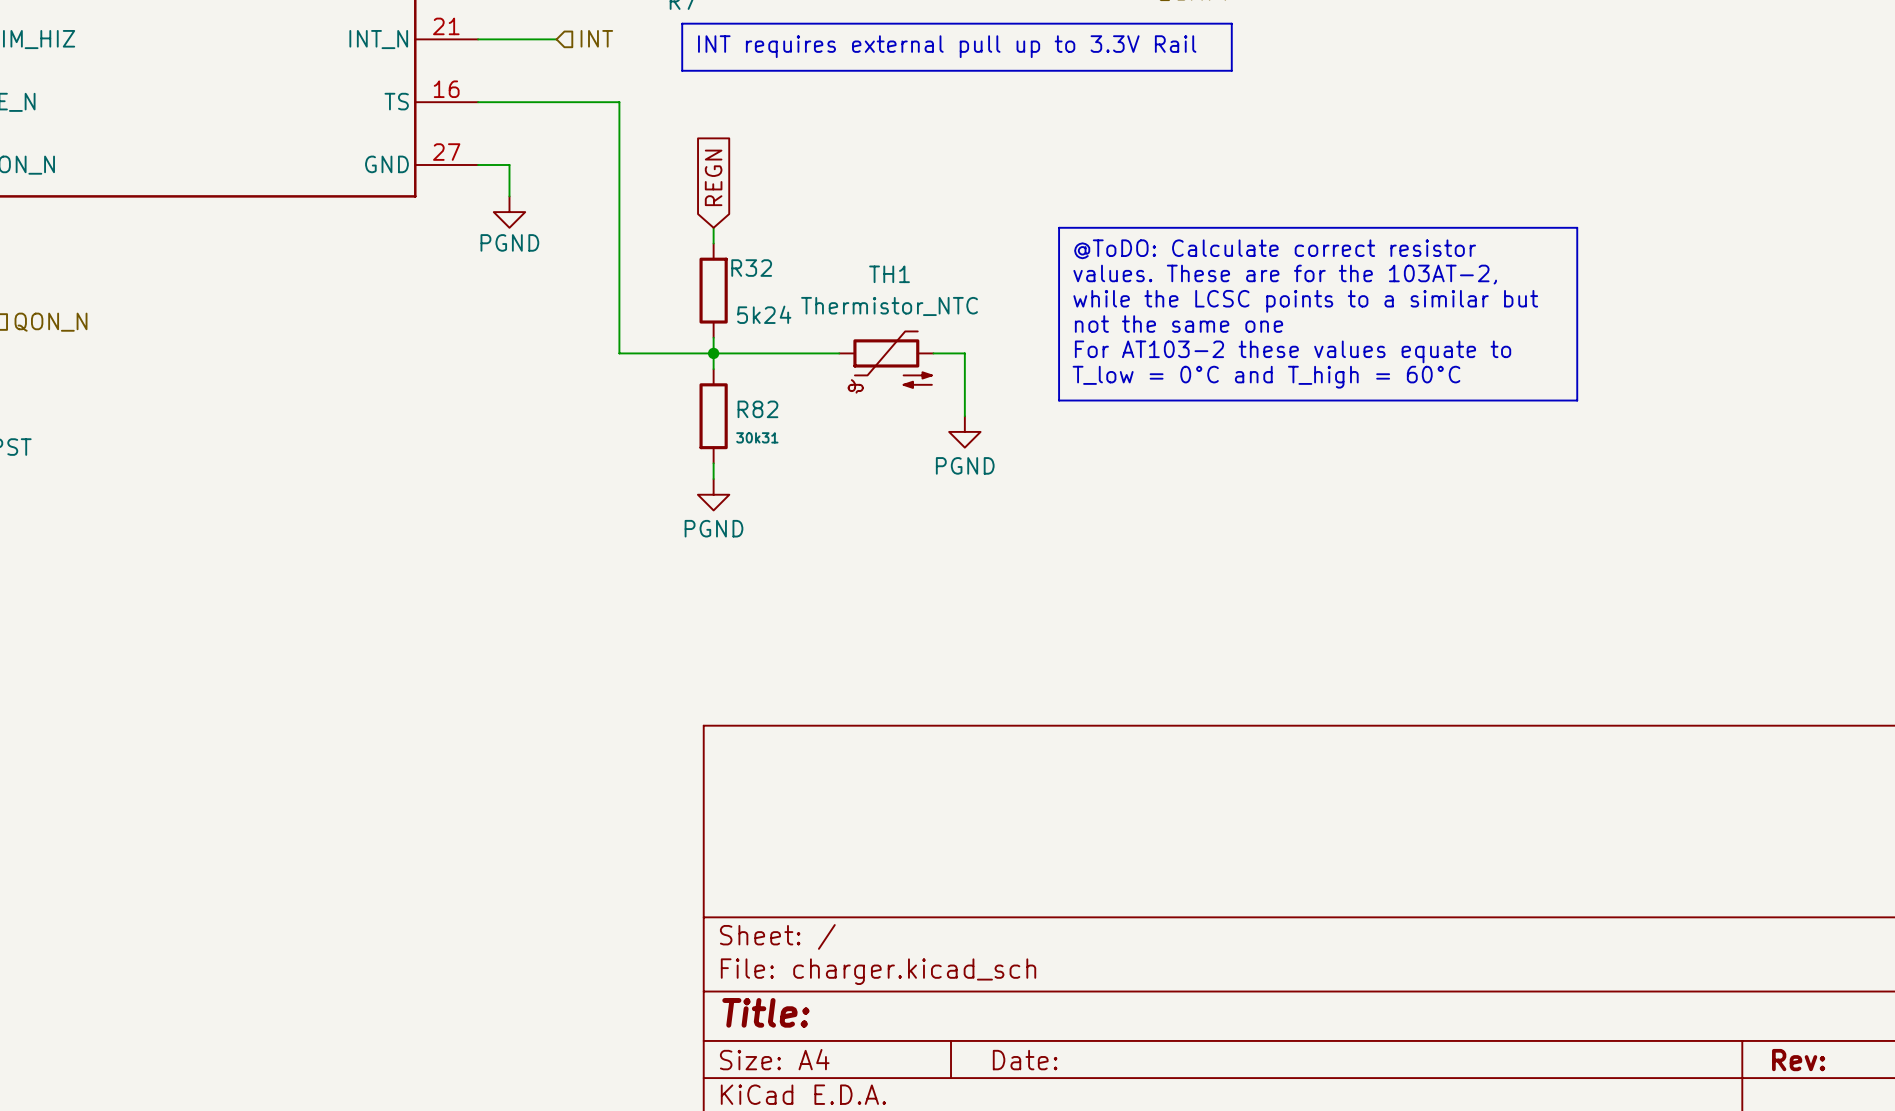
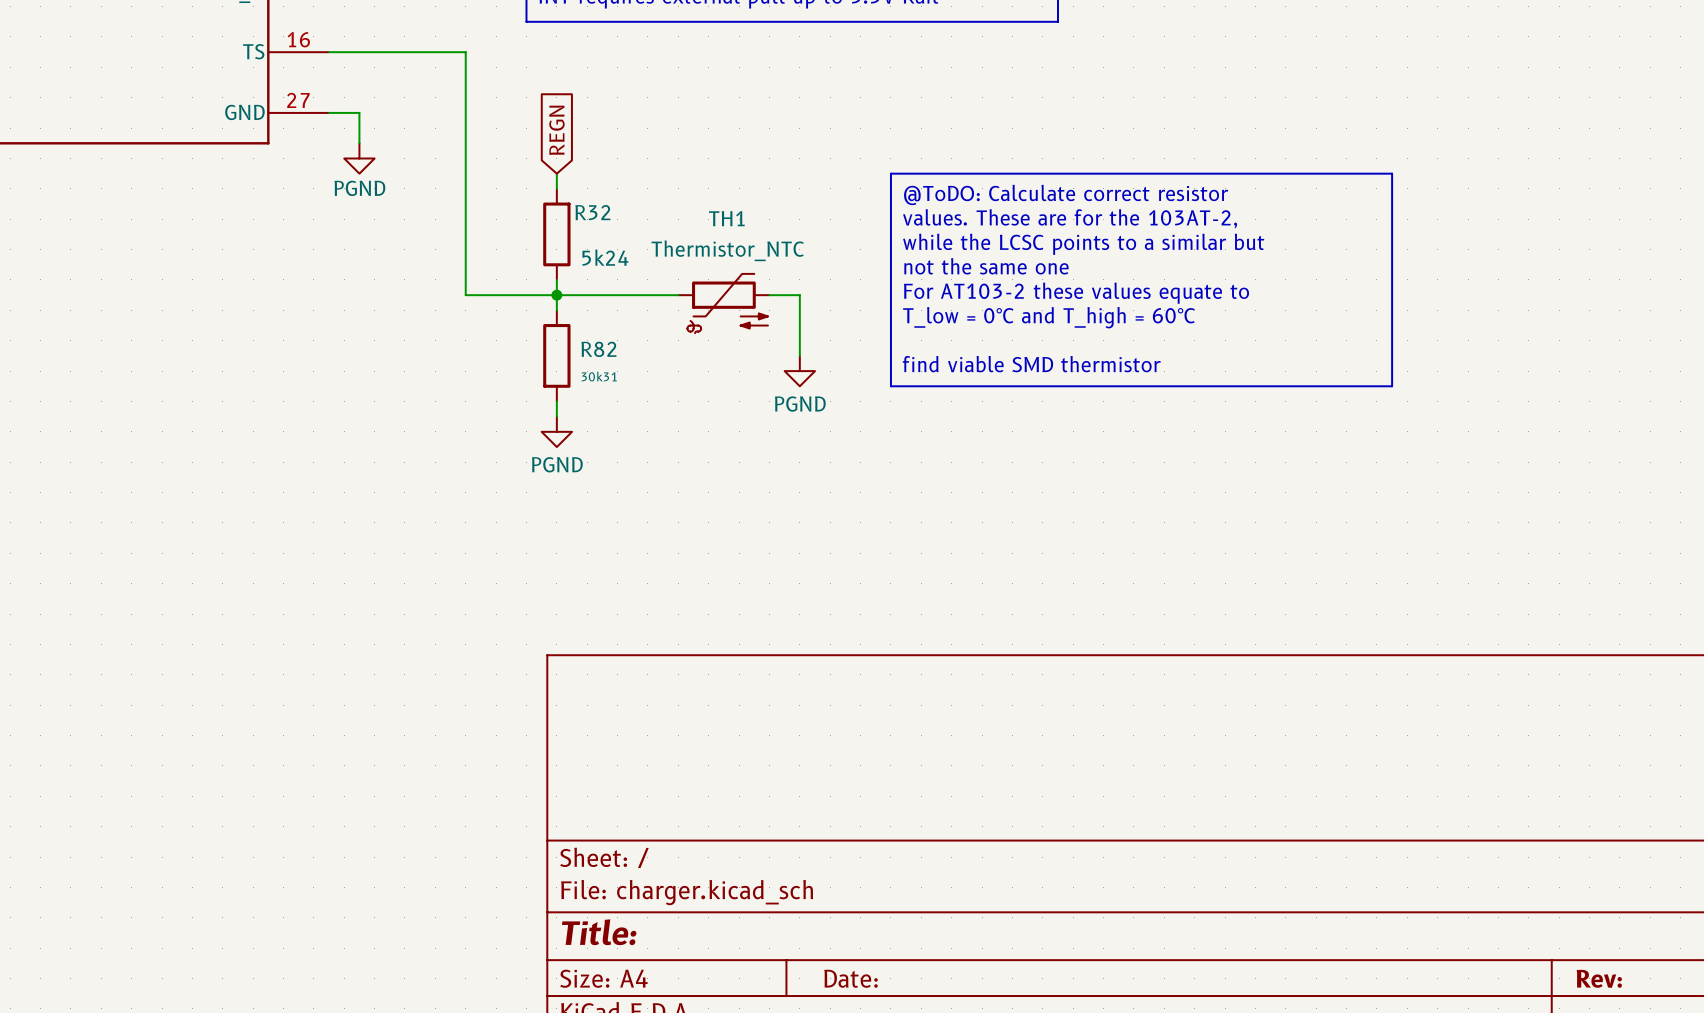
line: (1059, 400) (1577, 400) -> (890, 340) (890, 386) (1392, 386) (1392, 340)
text: none -> find viable SMD thermistor (1031, 364)

